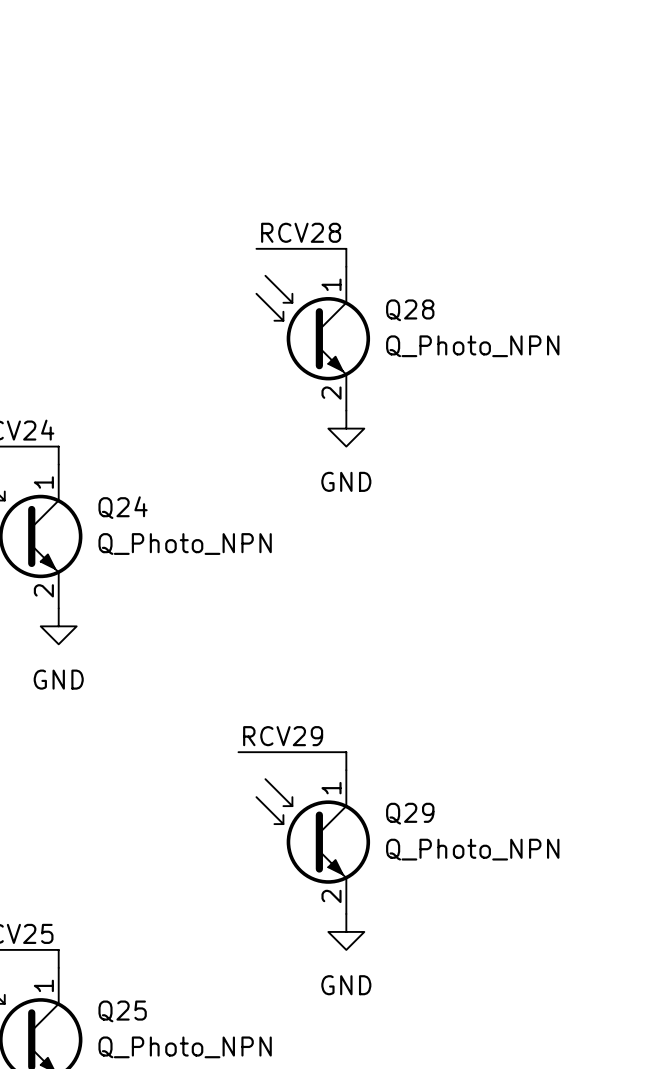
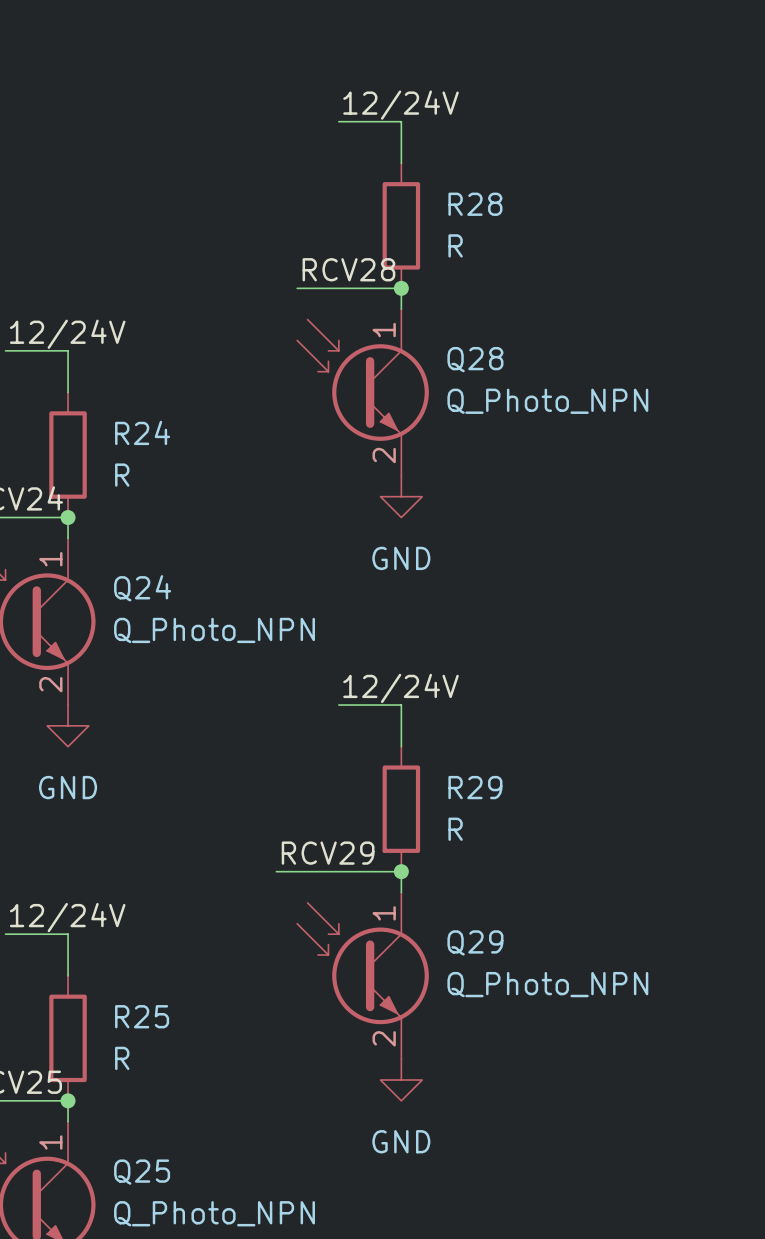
label: none -> 12/24V (401, 105)
wire: none -> (338, 121) (401, 121) (401, 163)
R28: none -> R (401, 225)
junction: none -> (401, 288)
label: none -> 12/24V (67, 334)
wire: none -> (5, 350) (68, 350) (68, 392)
R24: none -> R (68, 455)
junction: none -> (68, 517)
label: none -> 12/24V (401, 688)
wire: none -> (338, 705) (401, 705) (401, 746)
R29: none -> R (401, 809)
junction: none -> (401, 871)
label: none -> 12/24V (67, 917)
wire: none -> (5, 934) (68, 934) (68, 975)
R25: none -> R (68, 1038)
junction: none -> (68, 1100)

